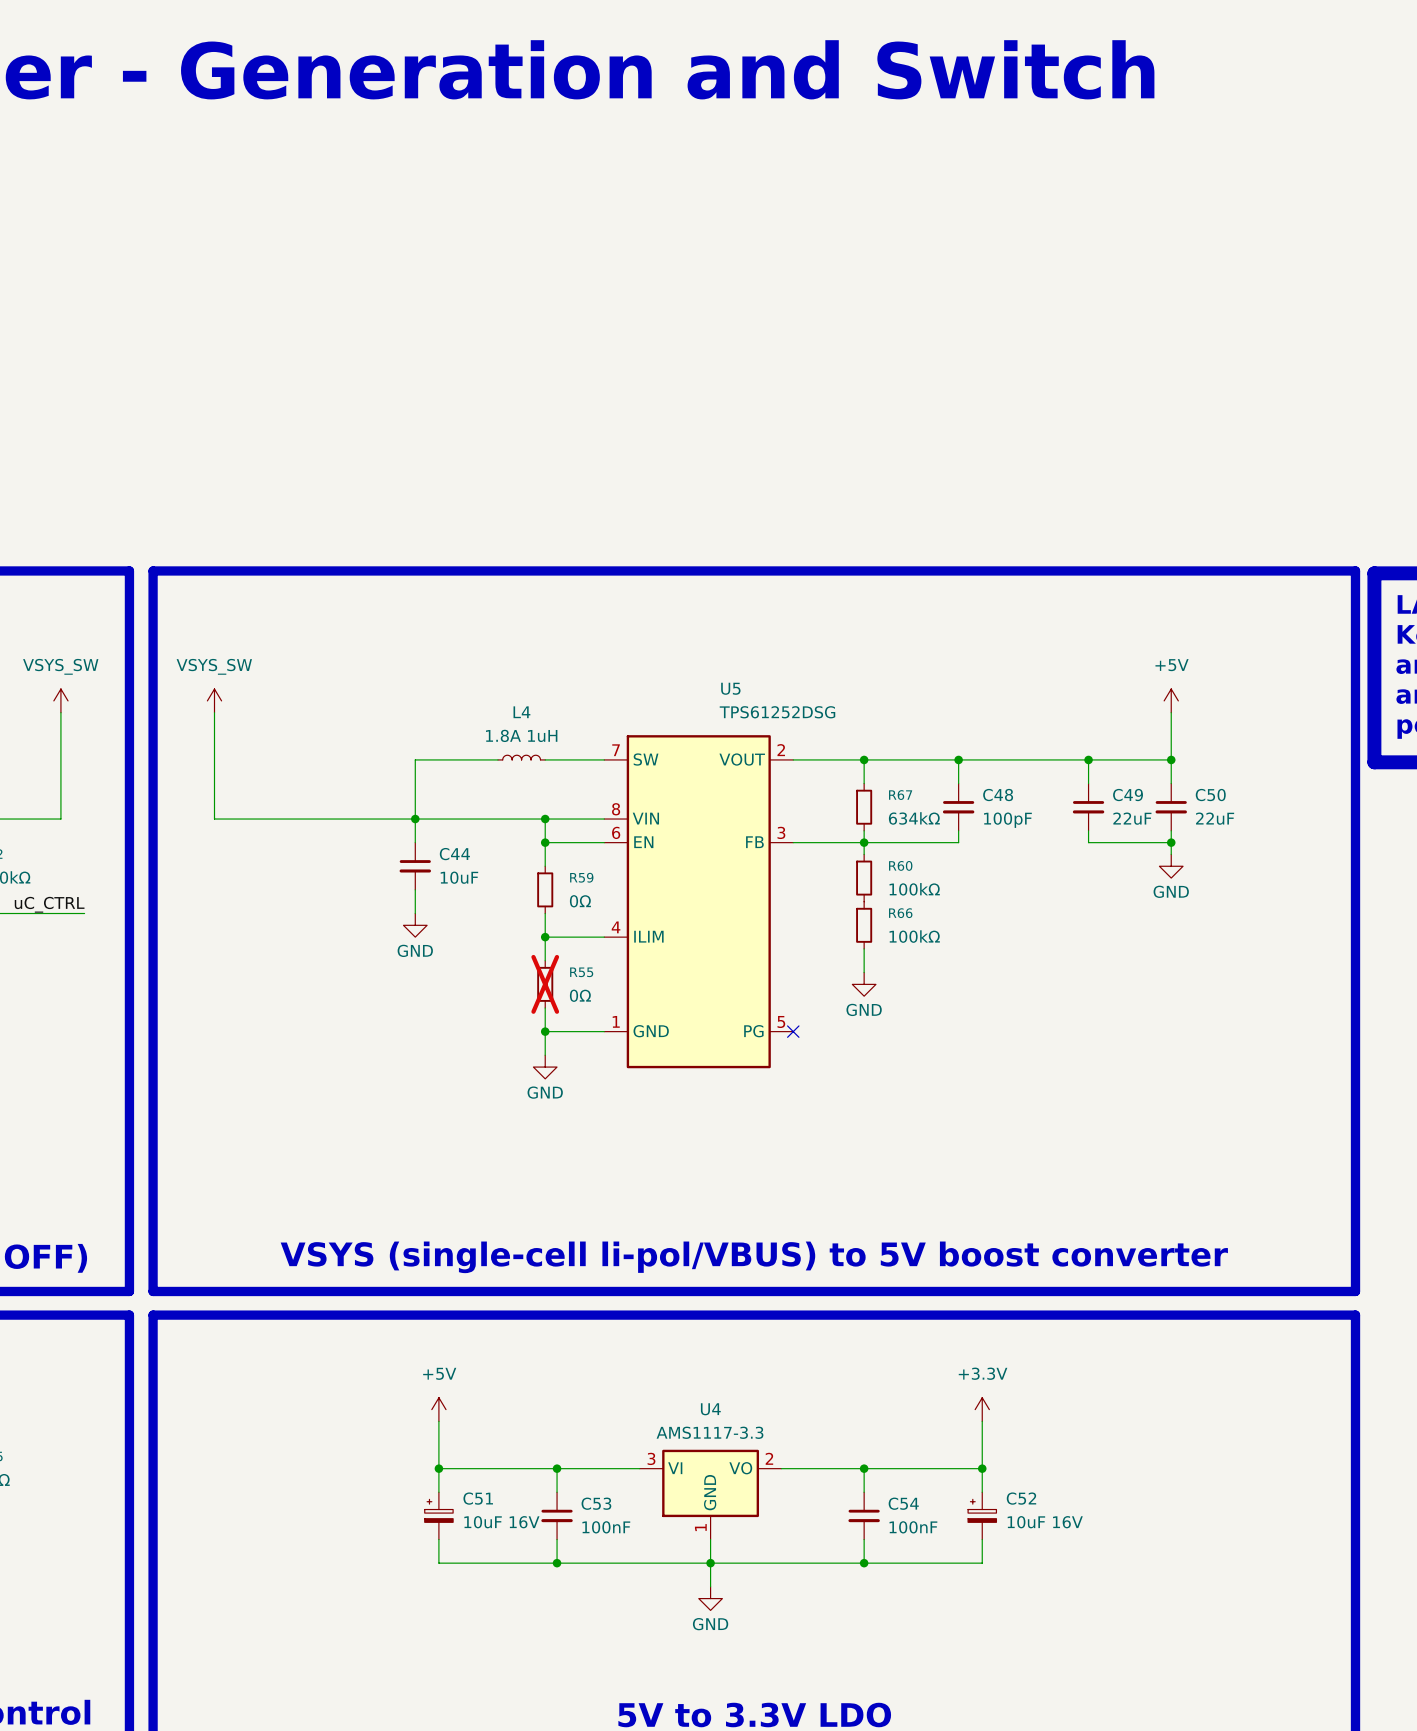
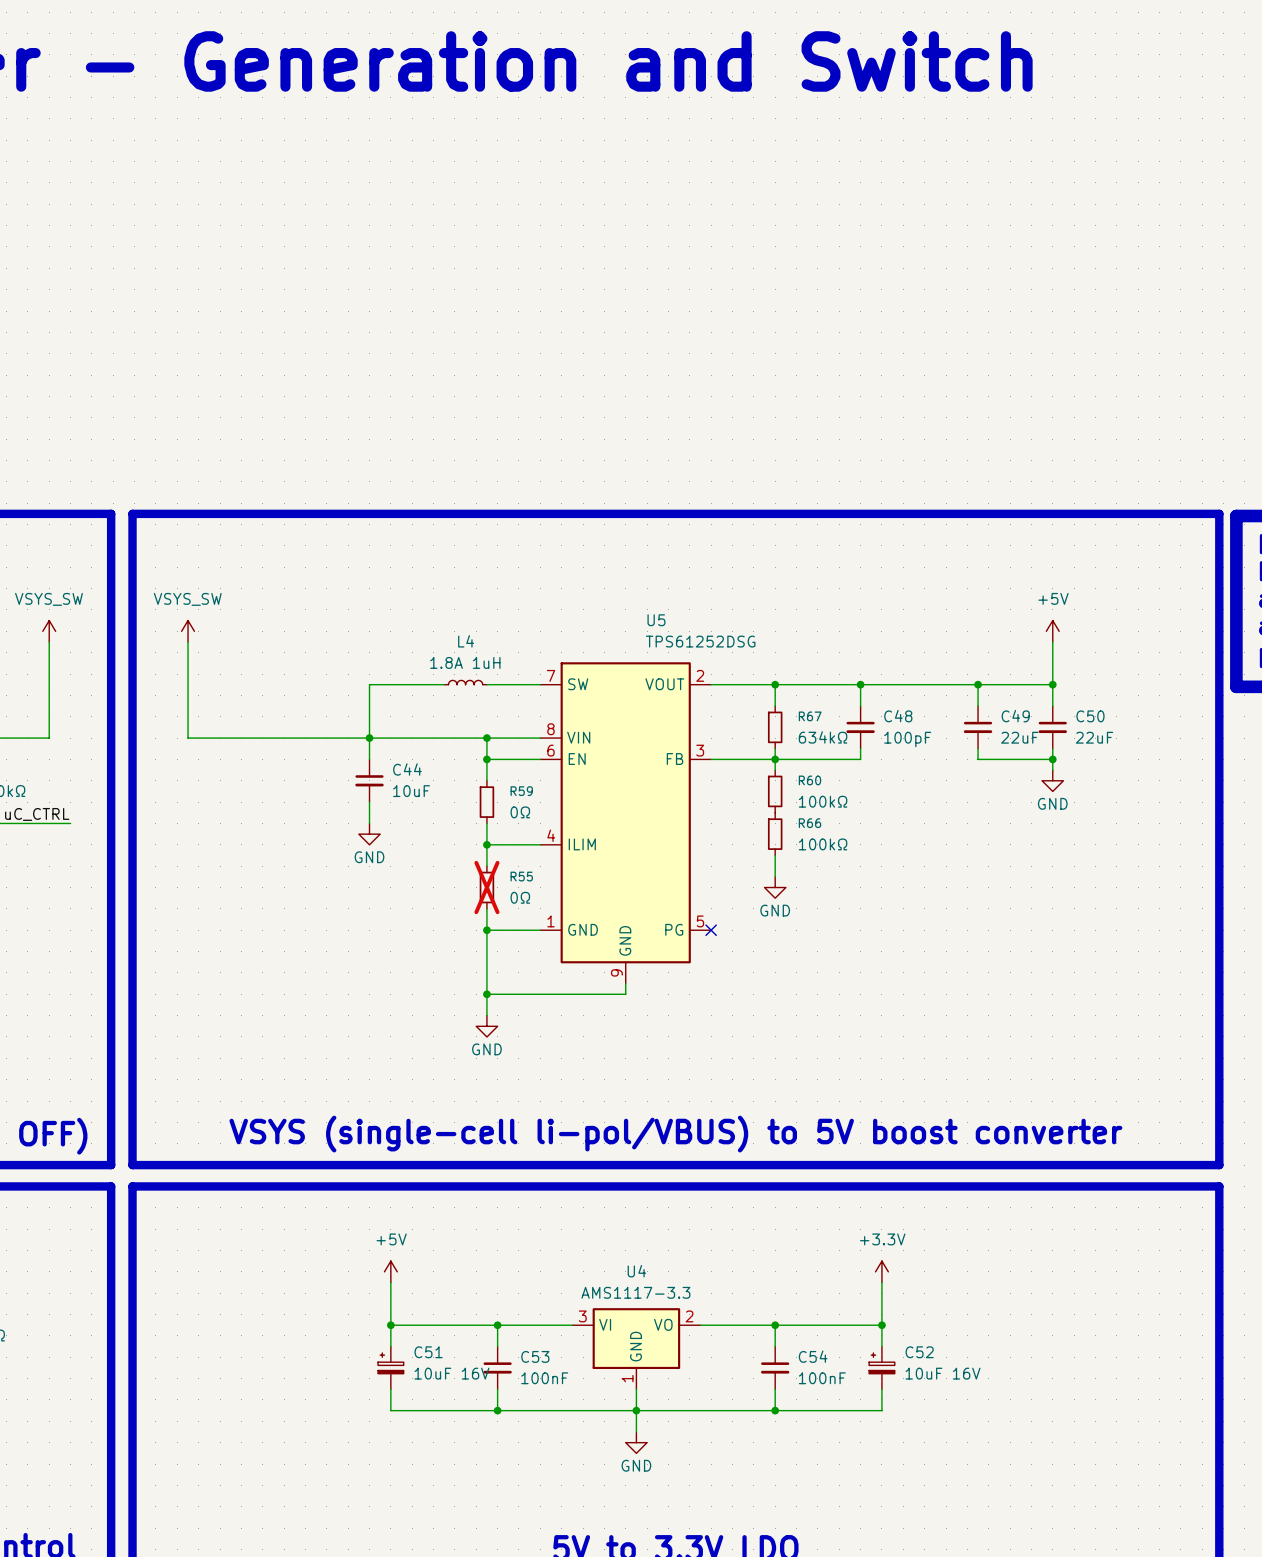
U5 symbol: [604, 735, 794, 1069] -> [540, 662, 712, 984]
wire: none -> (486, 951) (486, 1015)
power symbol position: GND (545, 1067) -> GND (486, 1026)
wire: none -> (625, 983) (625, 994) (486, 994)
junction: none -> (486, 994)

